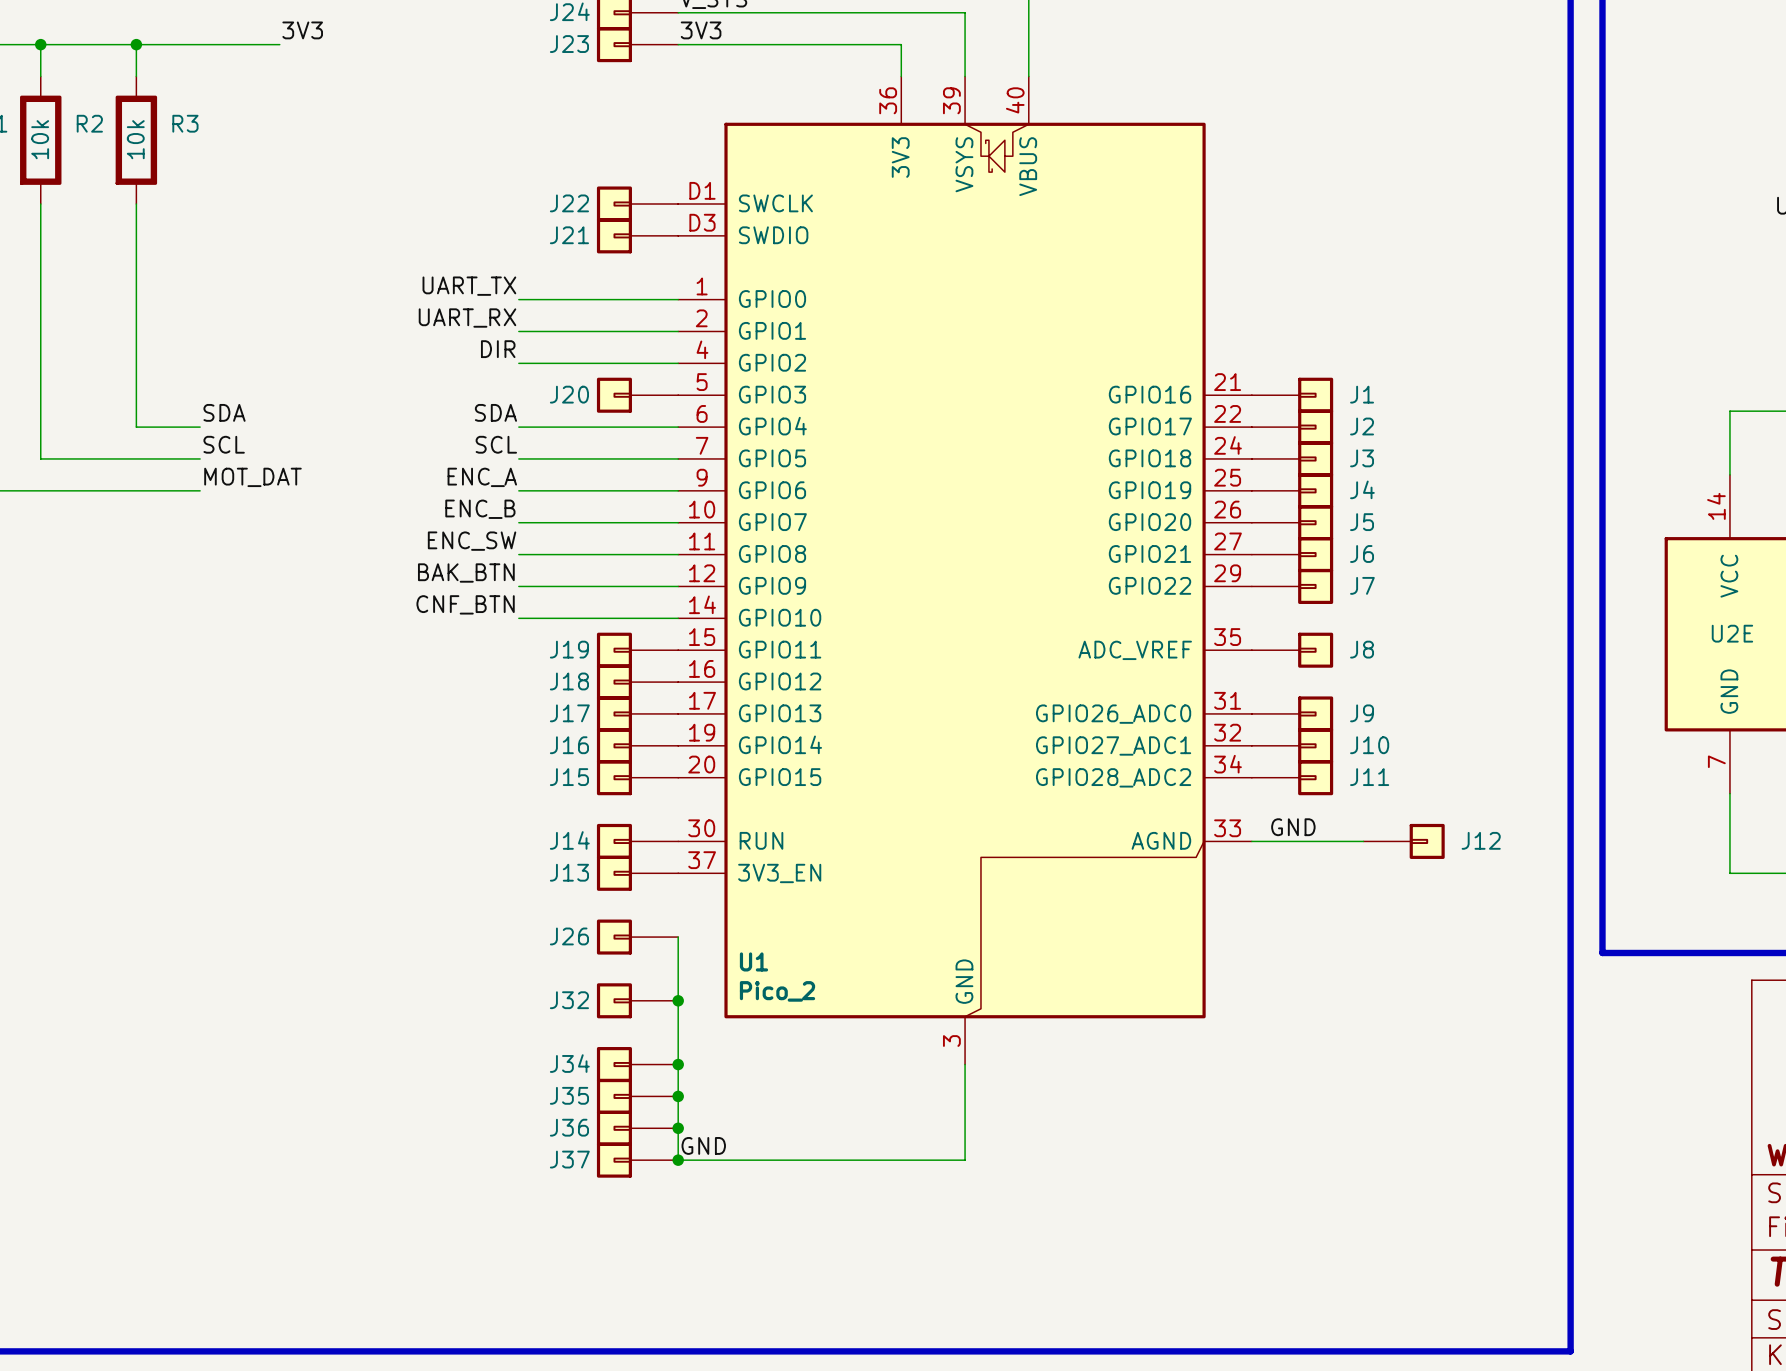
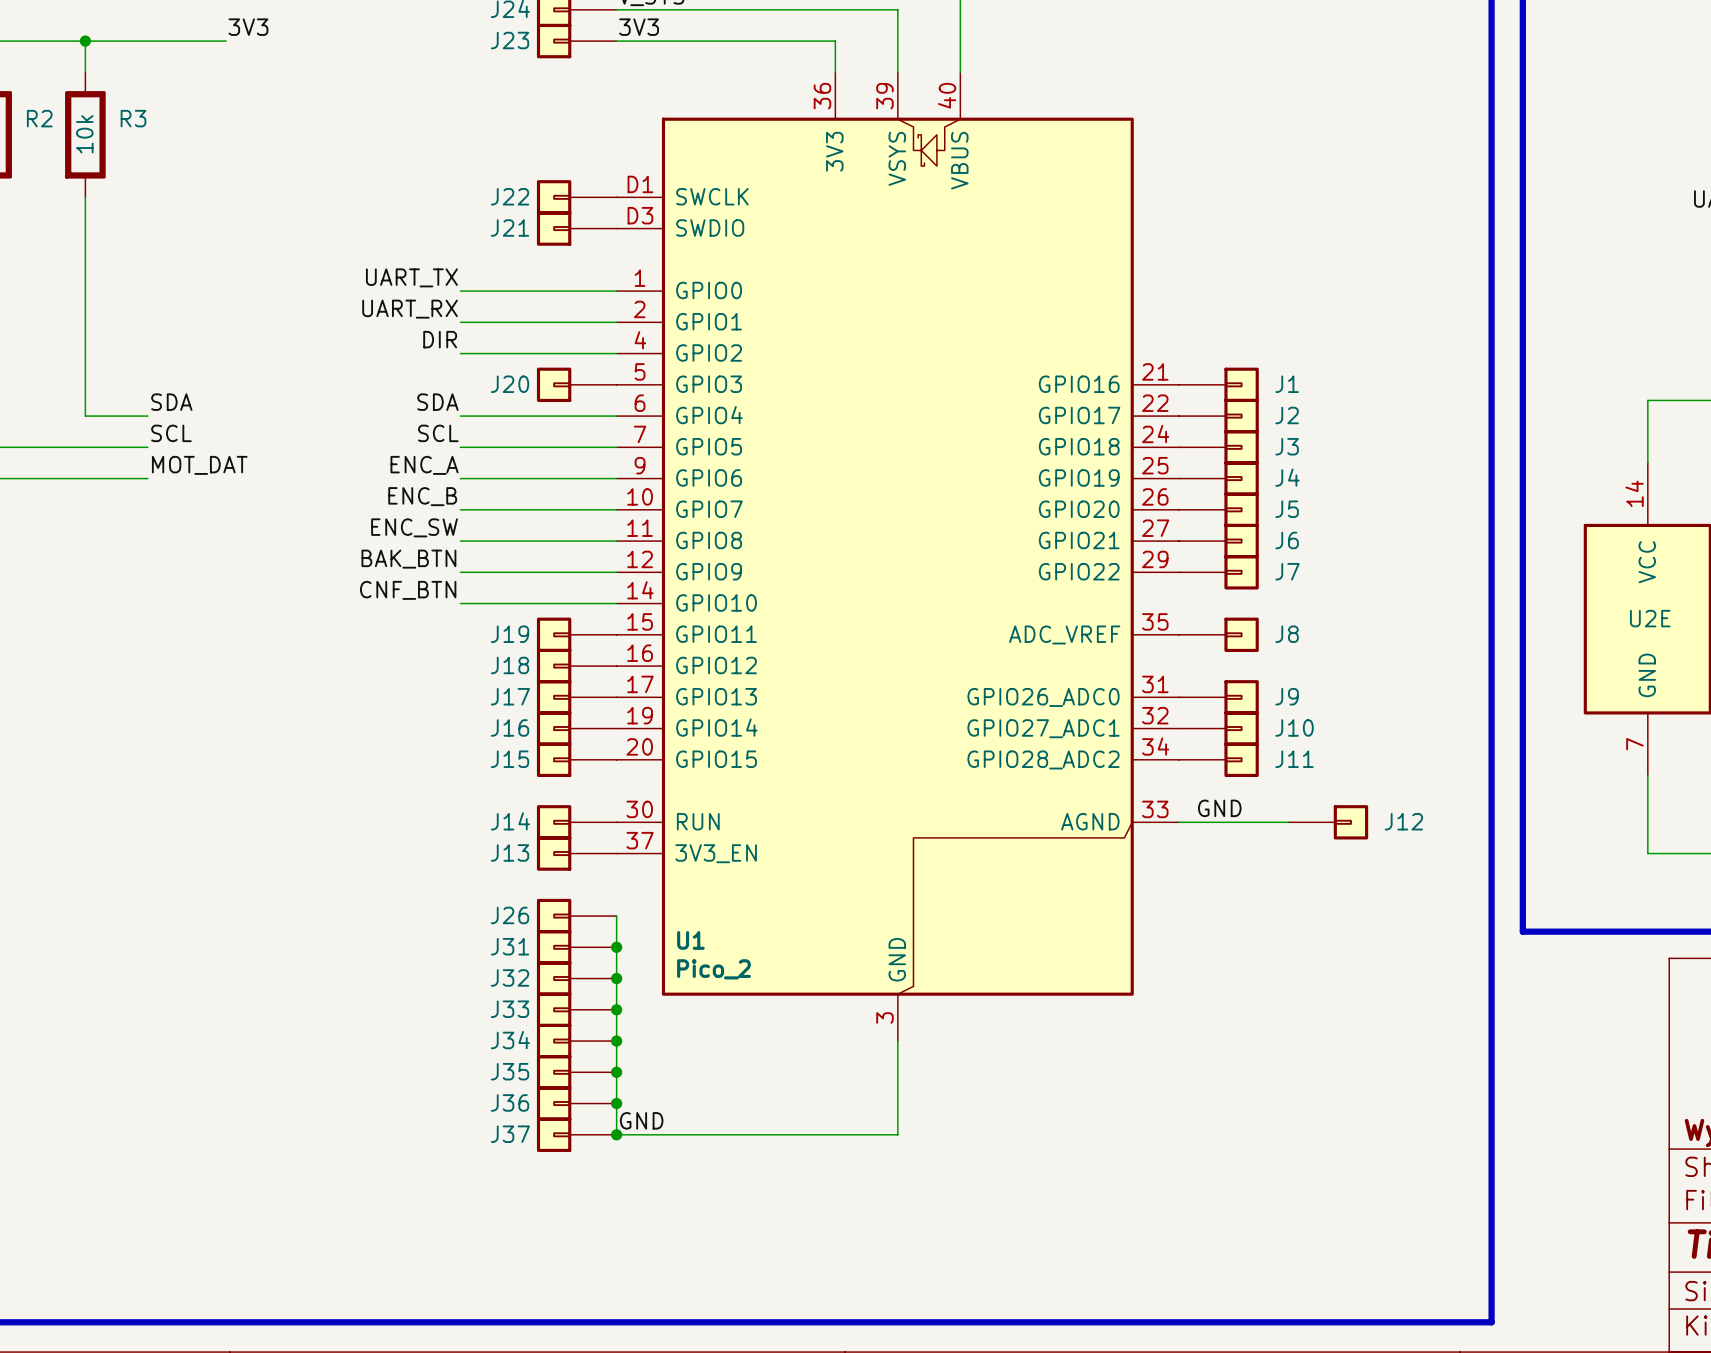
J31: none -> (576, 947)
junction: none -> (616, 947)
J33: none -> (576, 1009)
junction: none -> (616, 1009)

